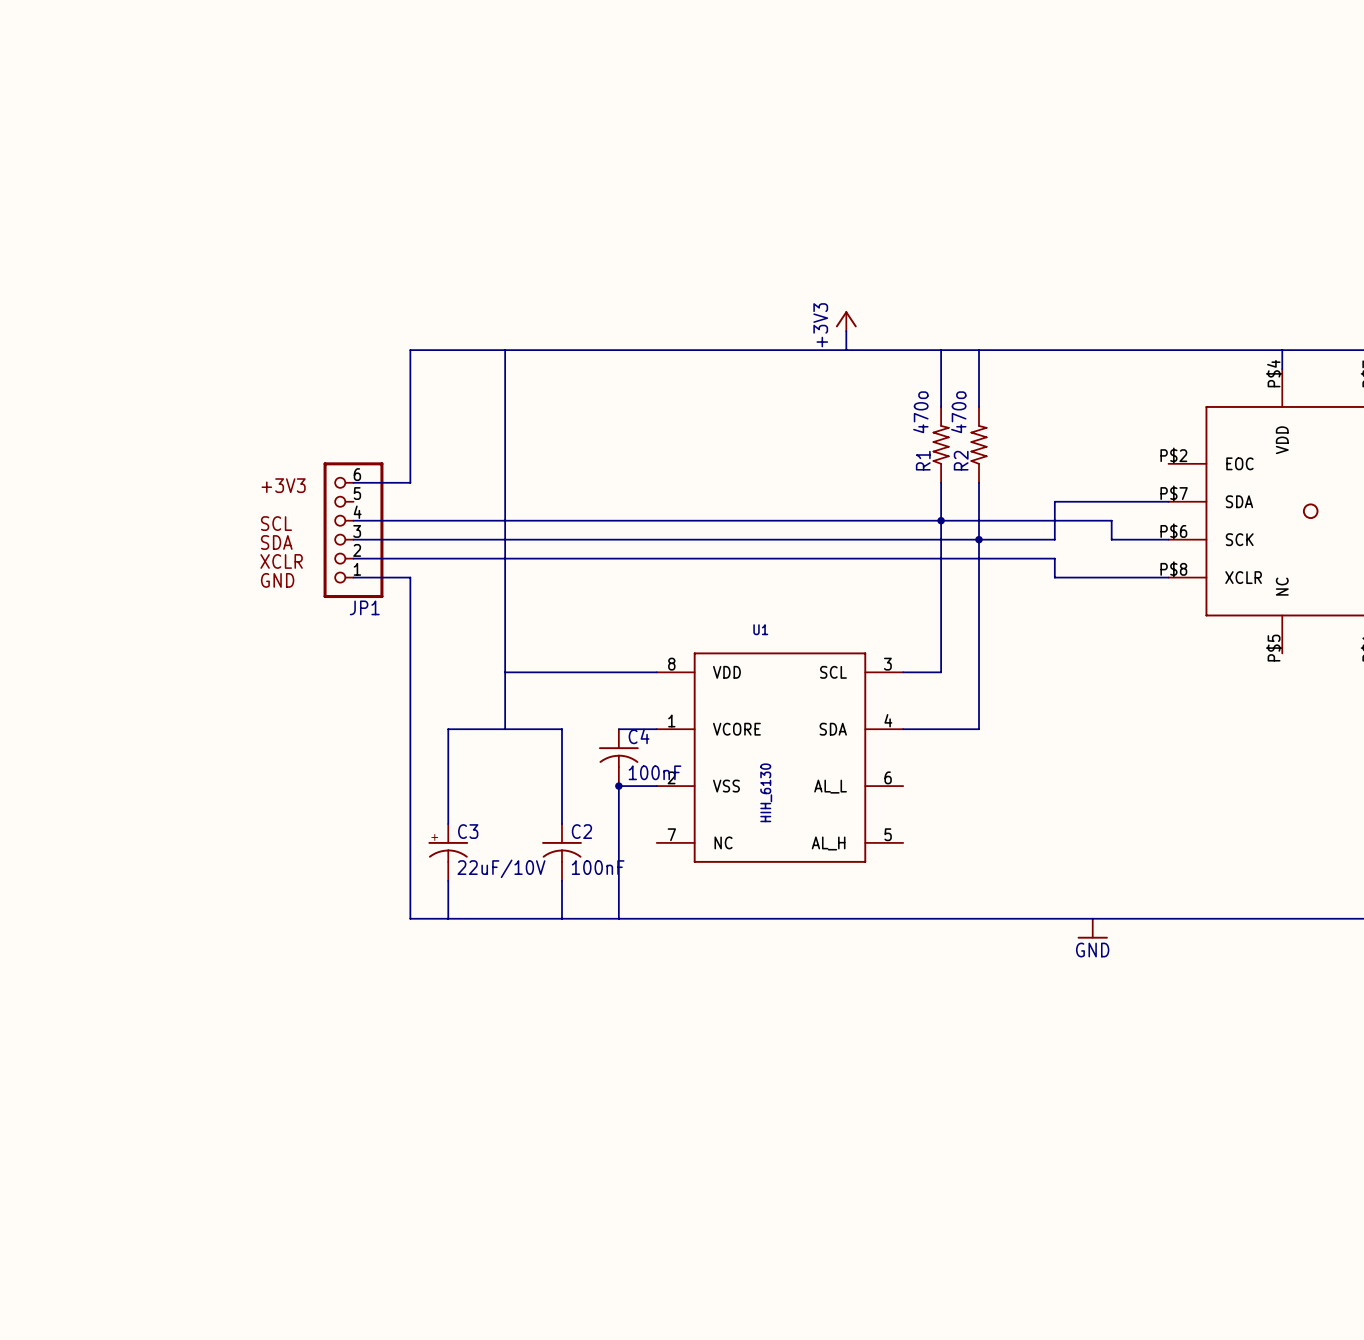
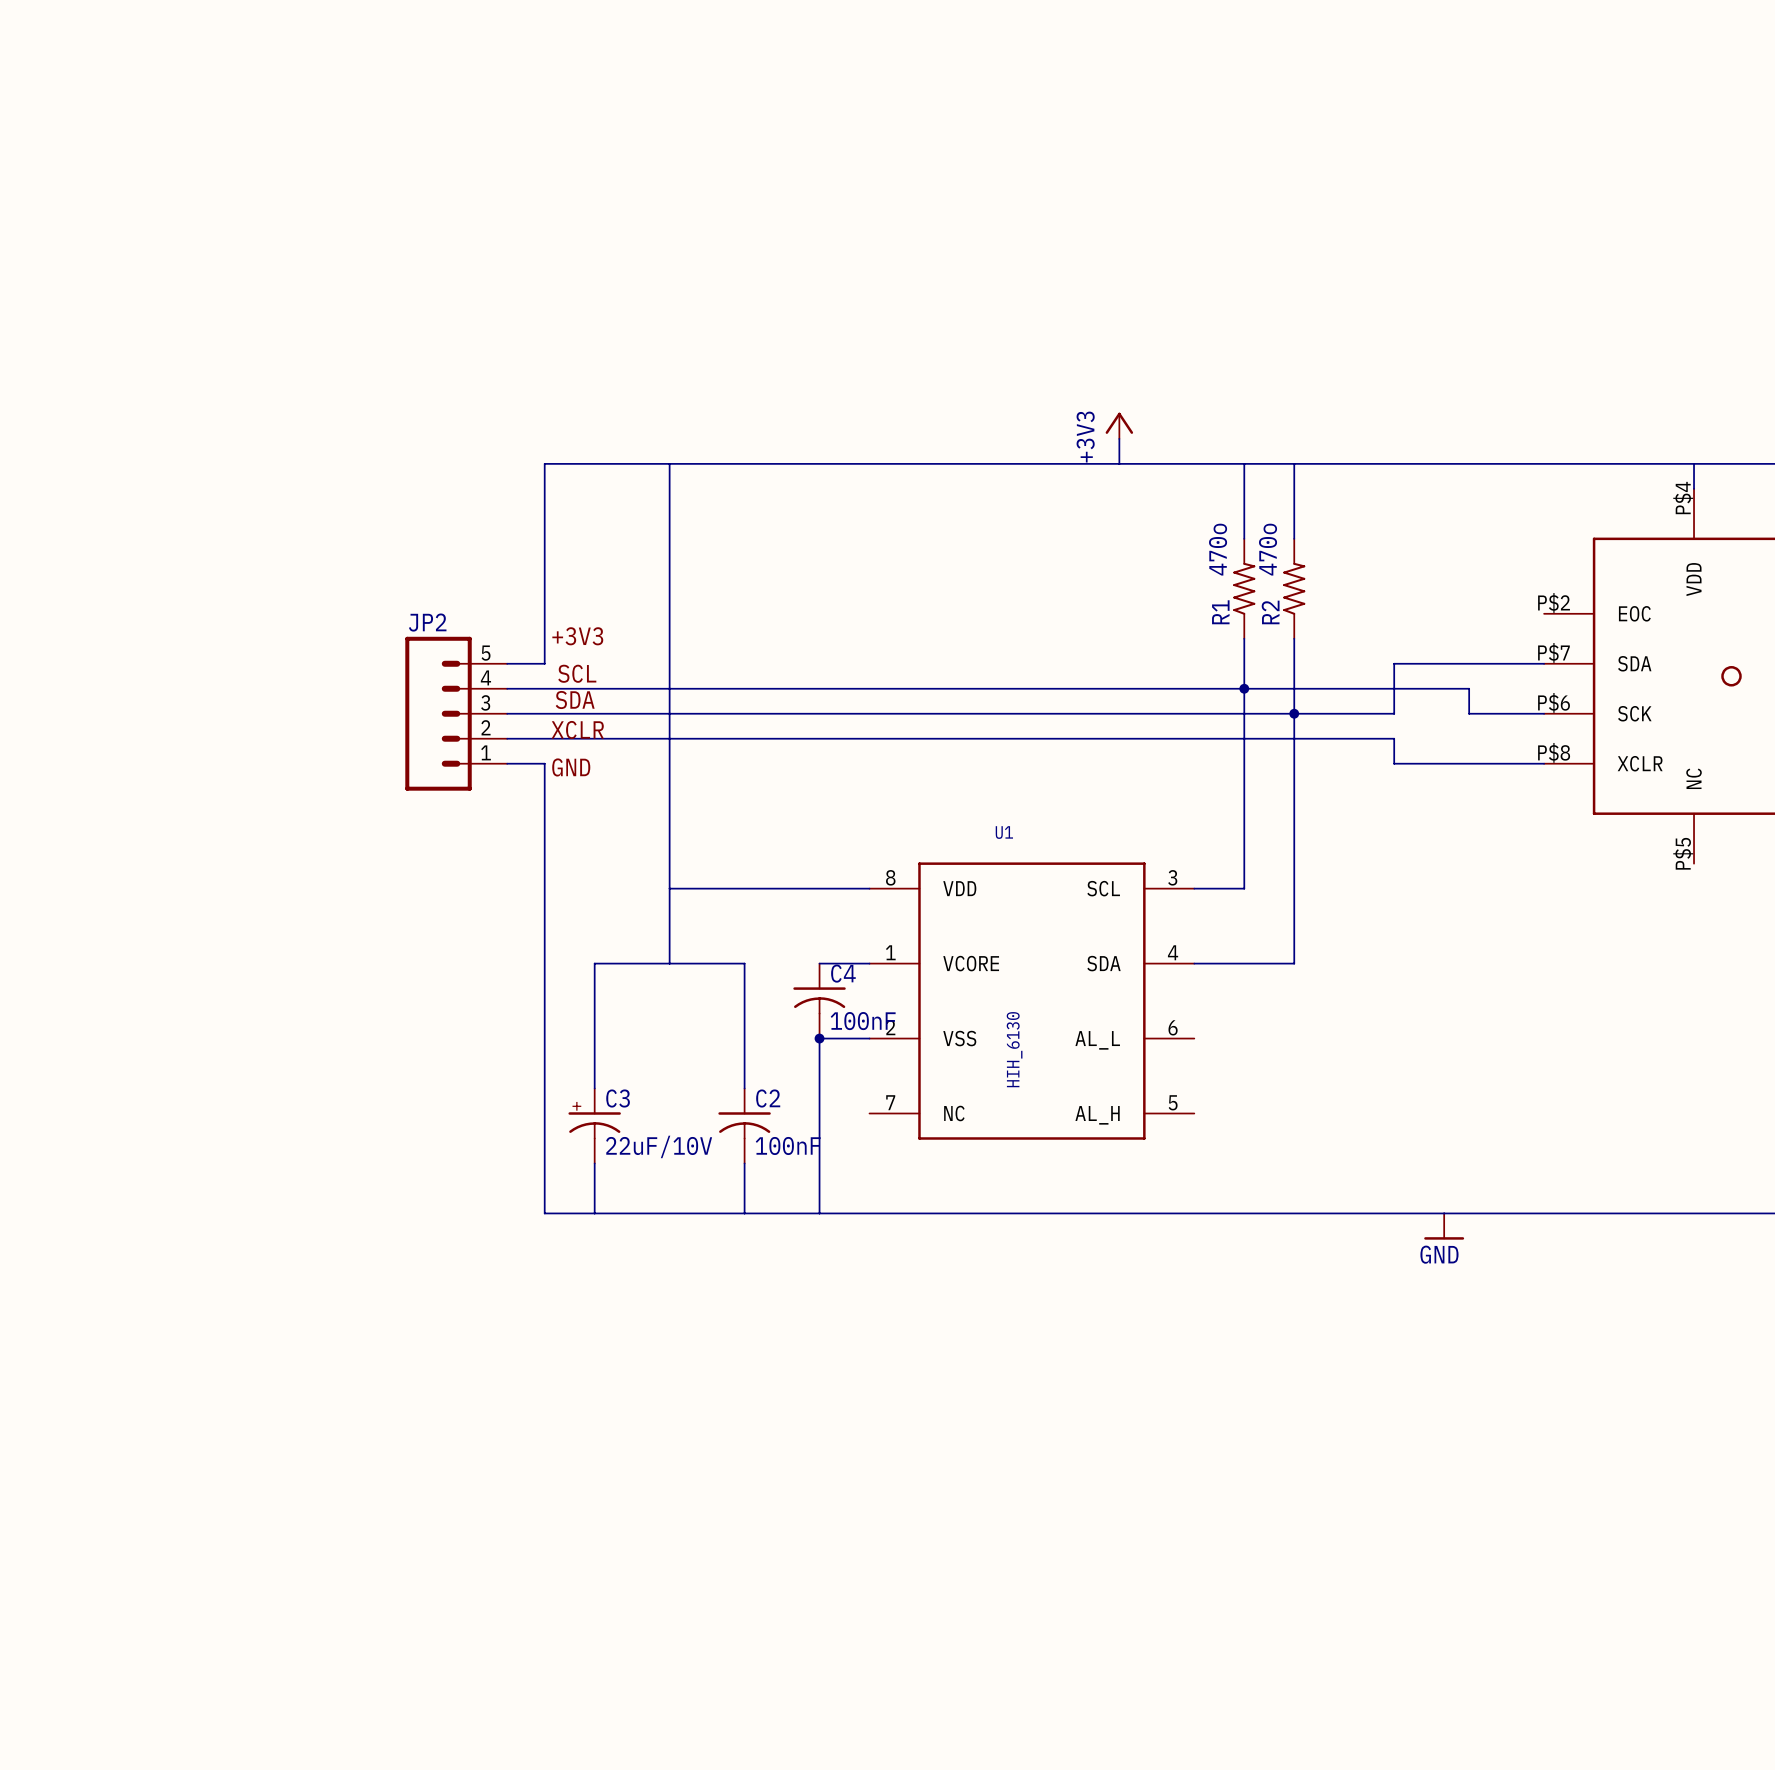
wire: (353, 482) (410, 482) -> (507, 663) (544, 663) (544, 638)
label position: +3V3 (283, 485) -> +3V3 (577, 636)
label position: SCL (276, 523) -> SCL (577, 673)
JP1: (353, 530) -> none
JP2: none -> (456, 713)
label position: SDA (276, 542) -> SDA (575, 700)
label position: XCLR (281, 561) -> XCLR (577, 729)
label position: GND (277, 580) -> GND (571, 767)

